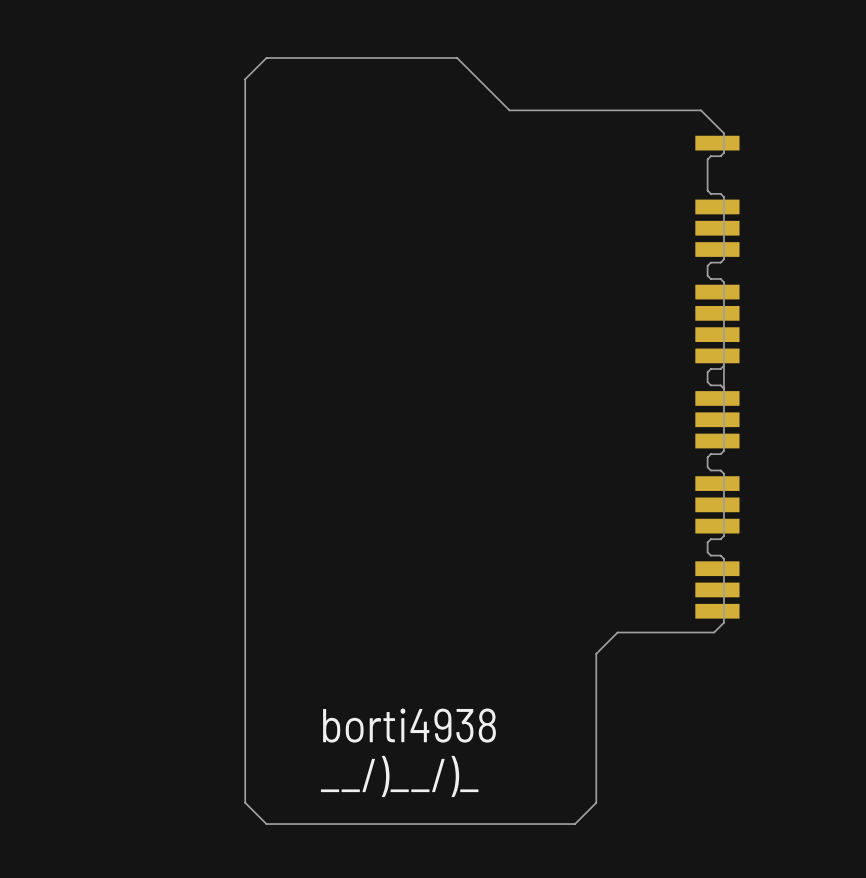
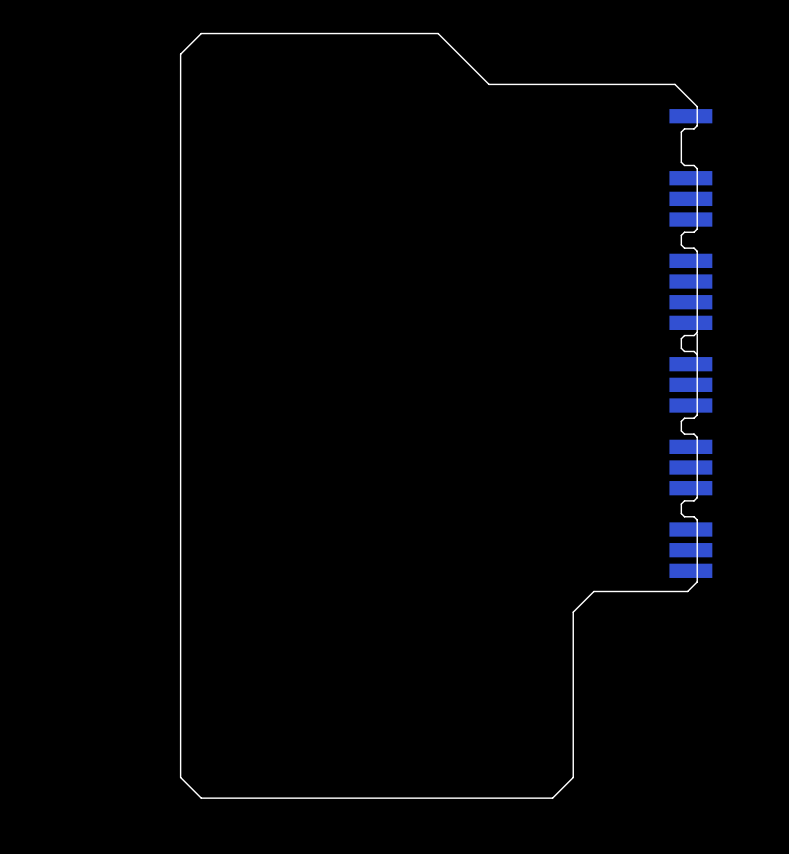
board edge: (266, 58) (245, 79) (245, 802) (266, 824) (575, 824) (596, 802) -> (252, 33) (201, 33) (180, 54) (180, 777) (201, 798) (552, 798) (573, 777) (573, 756)
text: borti4938 (409, 725) -> none
text: __/)__/)_ (399, 776) -> none

